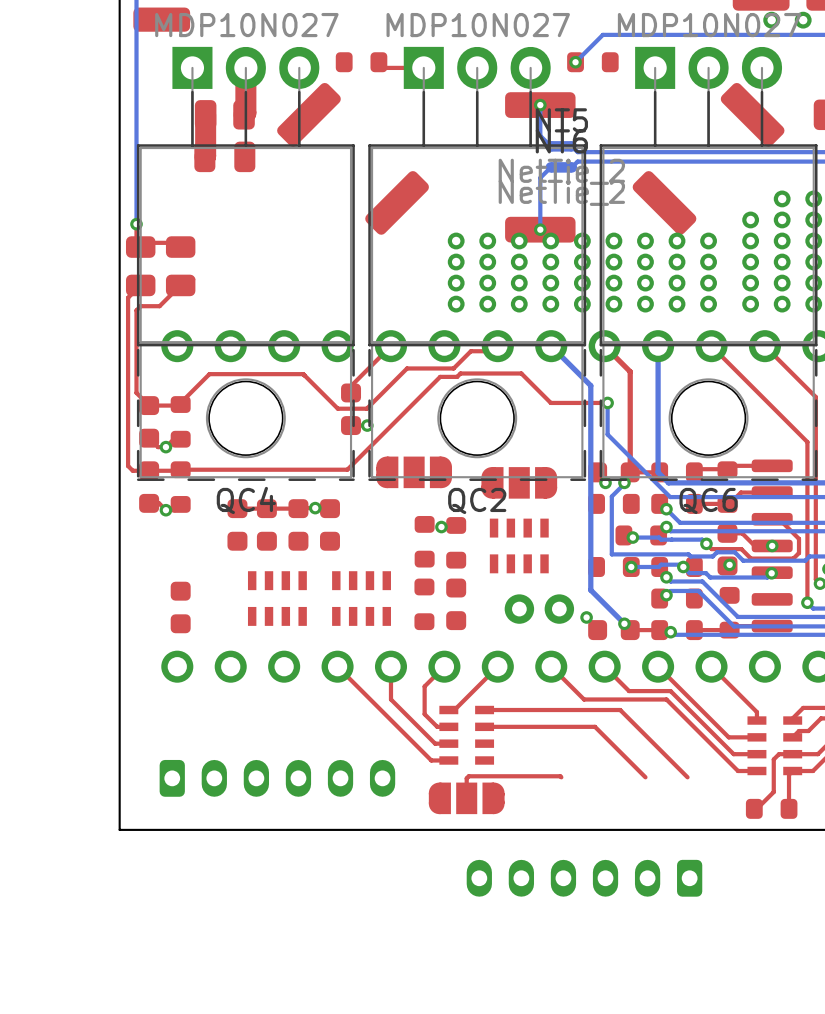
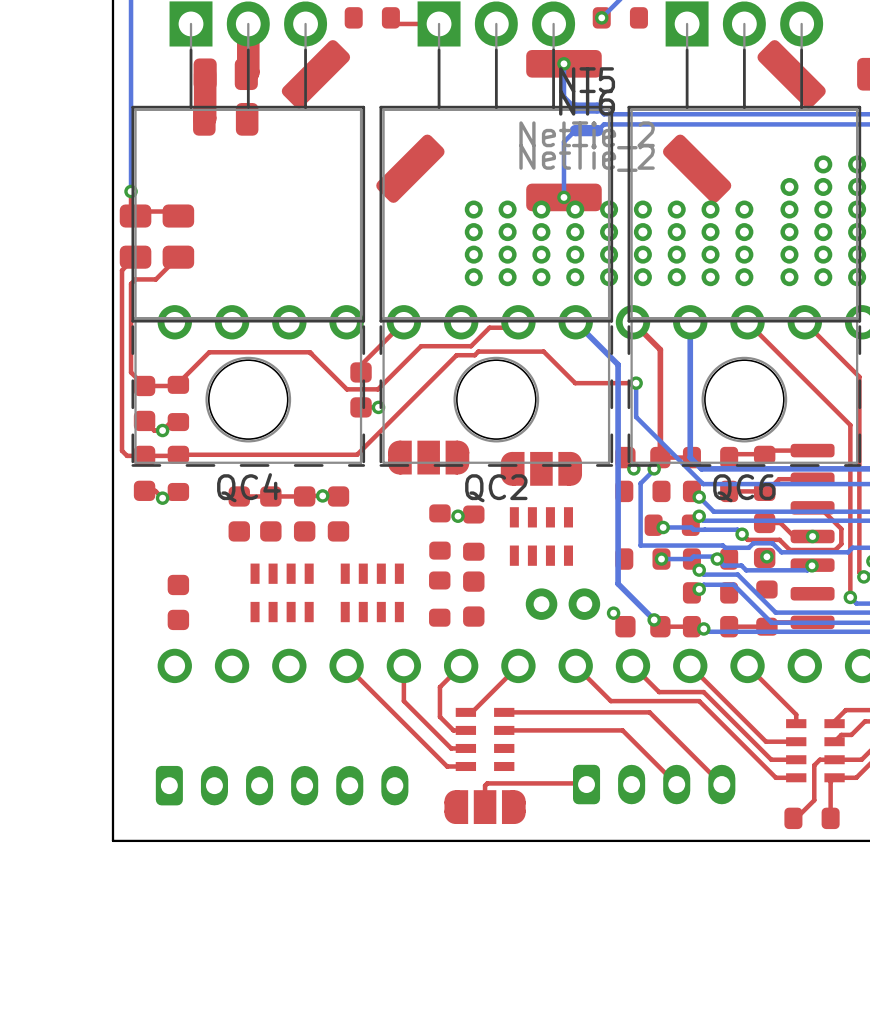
part: none -> (654, 784)
part: (584, 878) -> none

